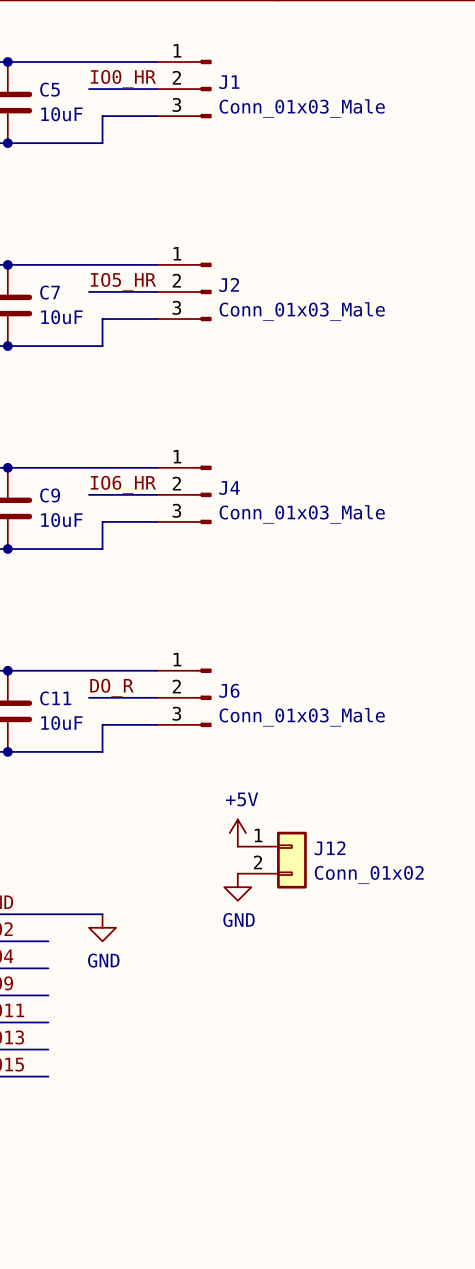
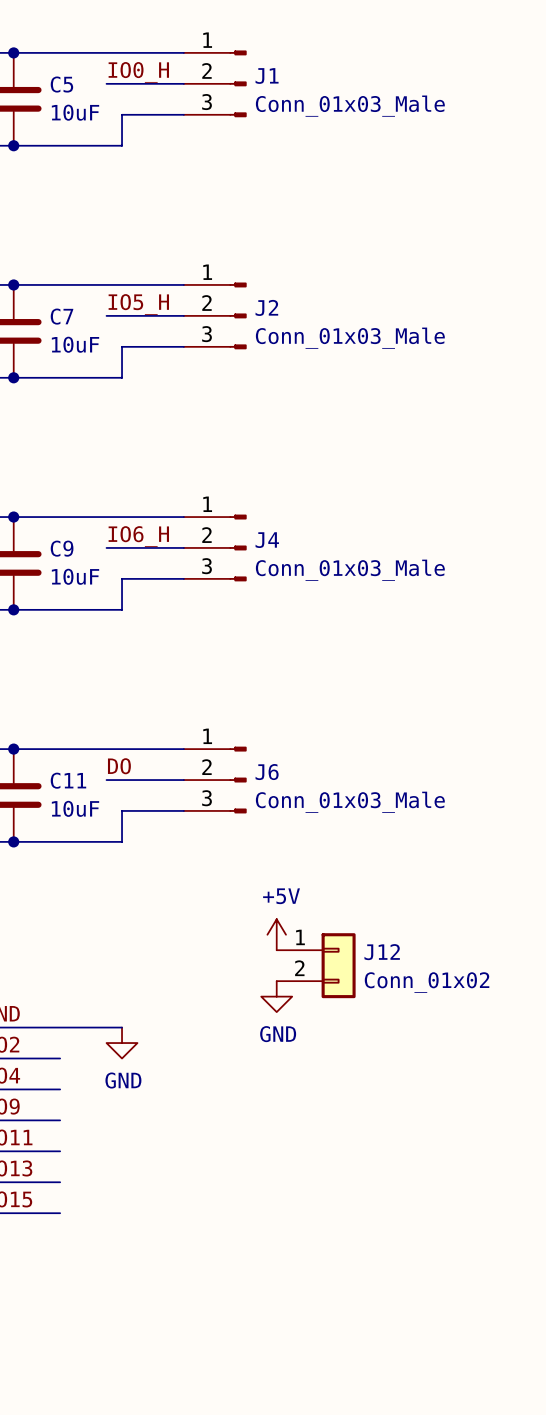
label: IO0_HR (123, 79) -> IO0_H (138, 72)
label: IO5_HR (123, 281) -> IO5_H (138, 304)
label: IO6_HR (123, 484) -> IO6_H (138, 536)
label: DO_R (111, 687) -> DO (119, 766)

